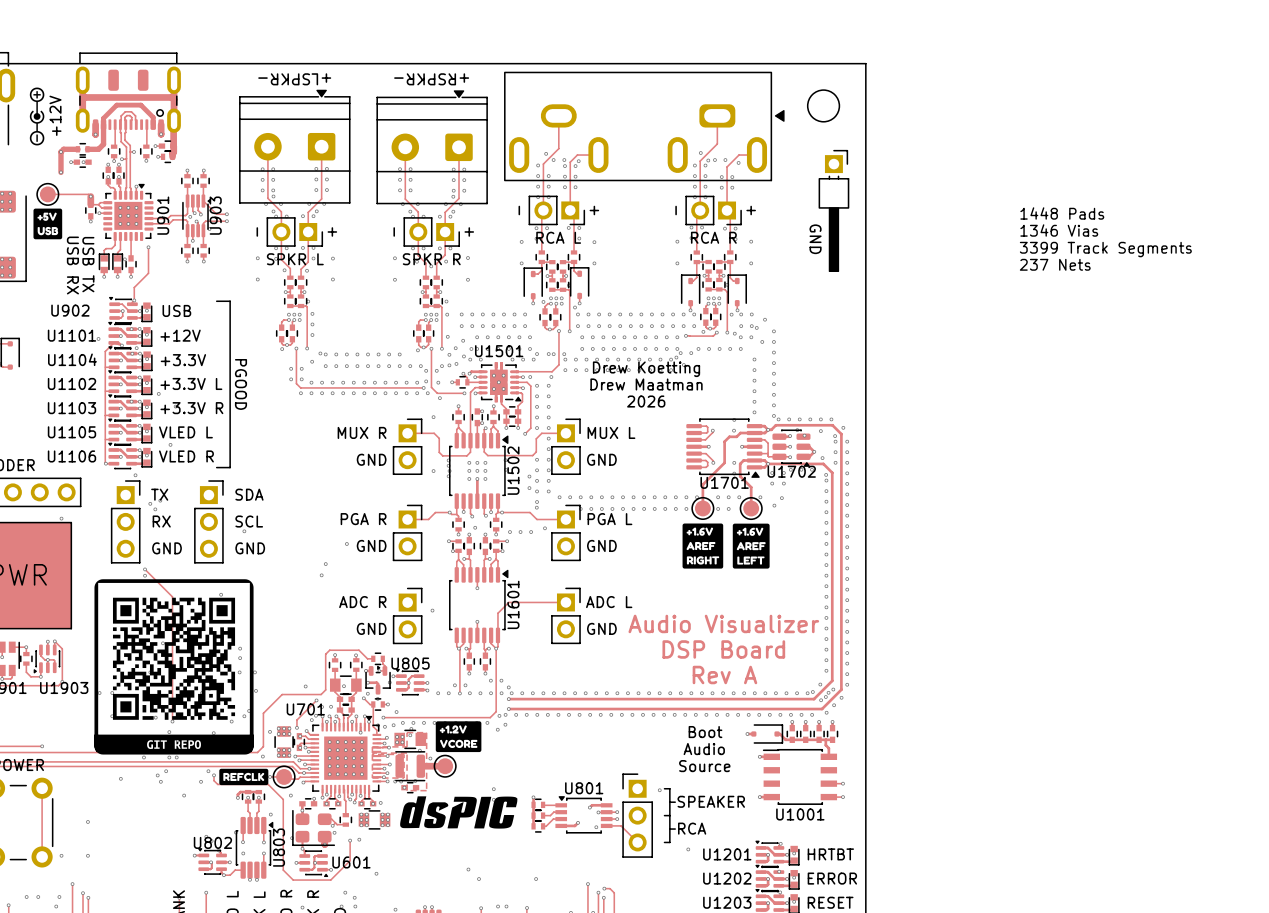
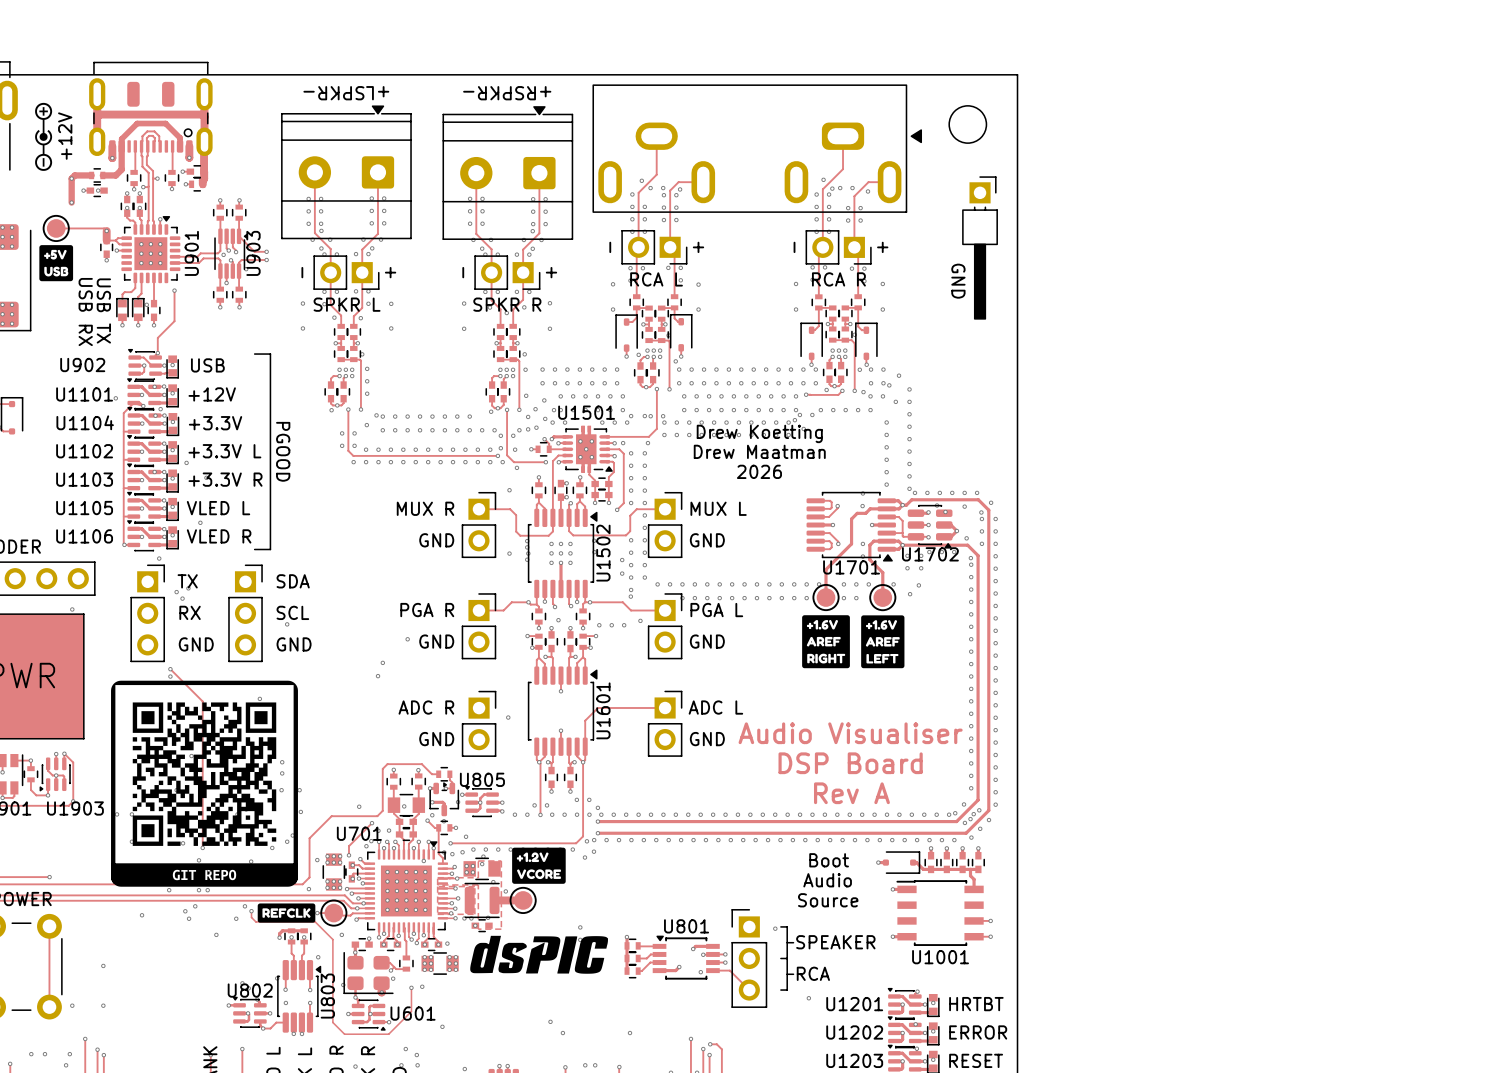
text: 1448 Pads (1062, 213) -> none
text: 1346 Vias (1059, 230) -> none
text: 3399 Track Segments (1105, 249) -> none
text: 237 Nets (1055, 264) -> none
text: Audio Visualizer (723, 623) -> Audio Visualiser (850, 733)

